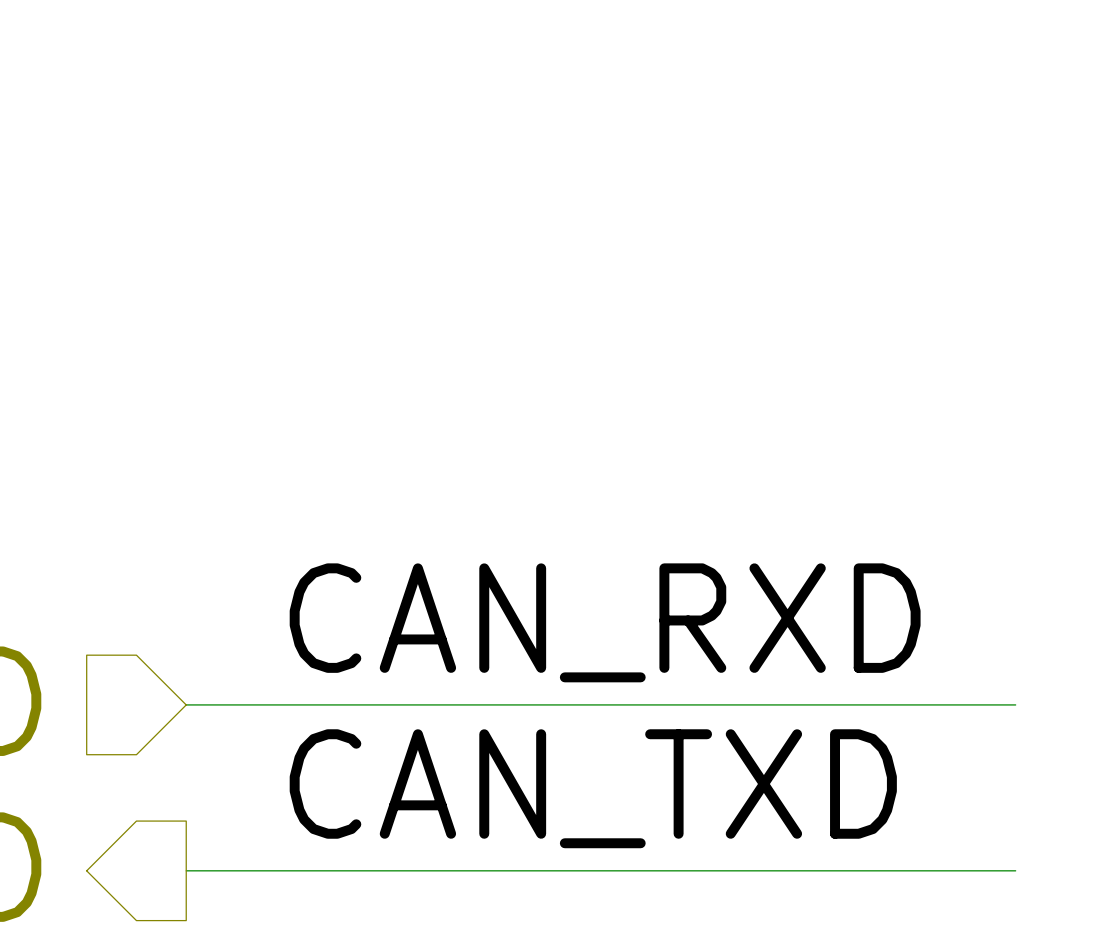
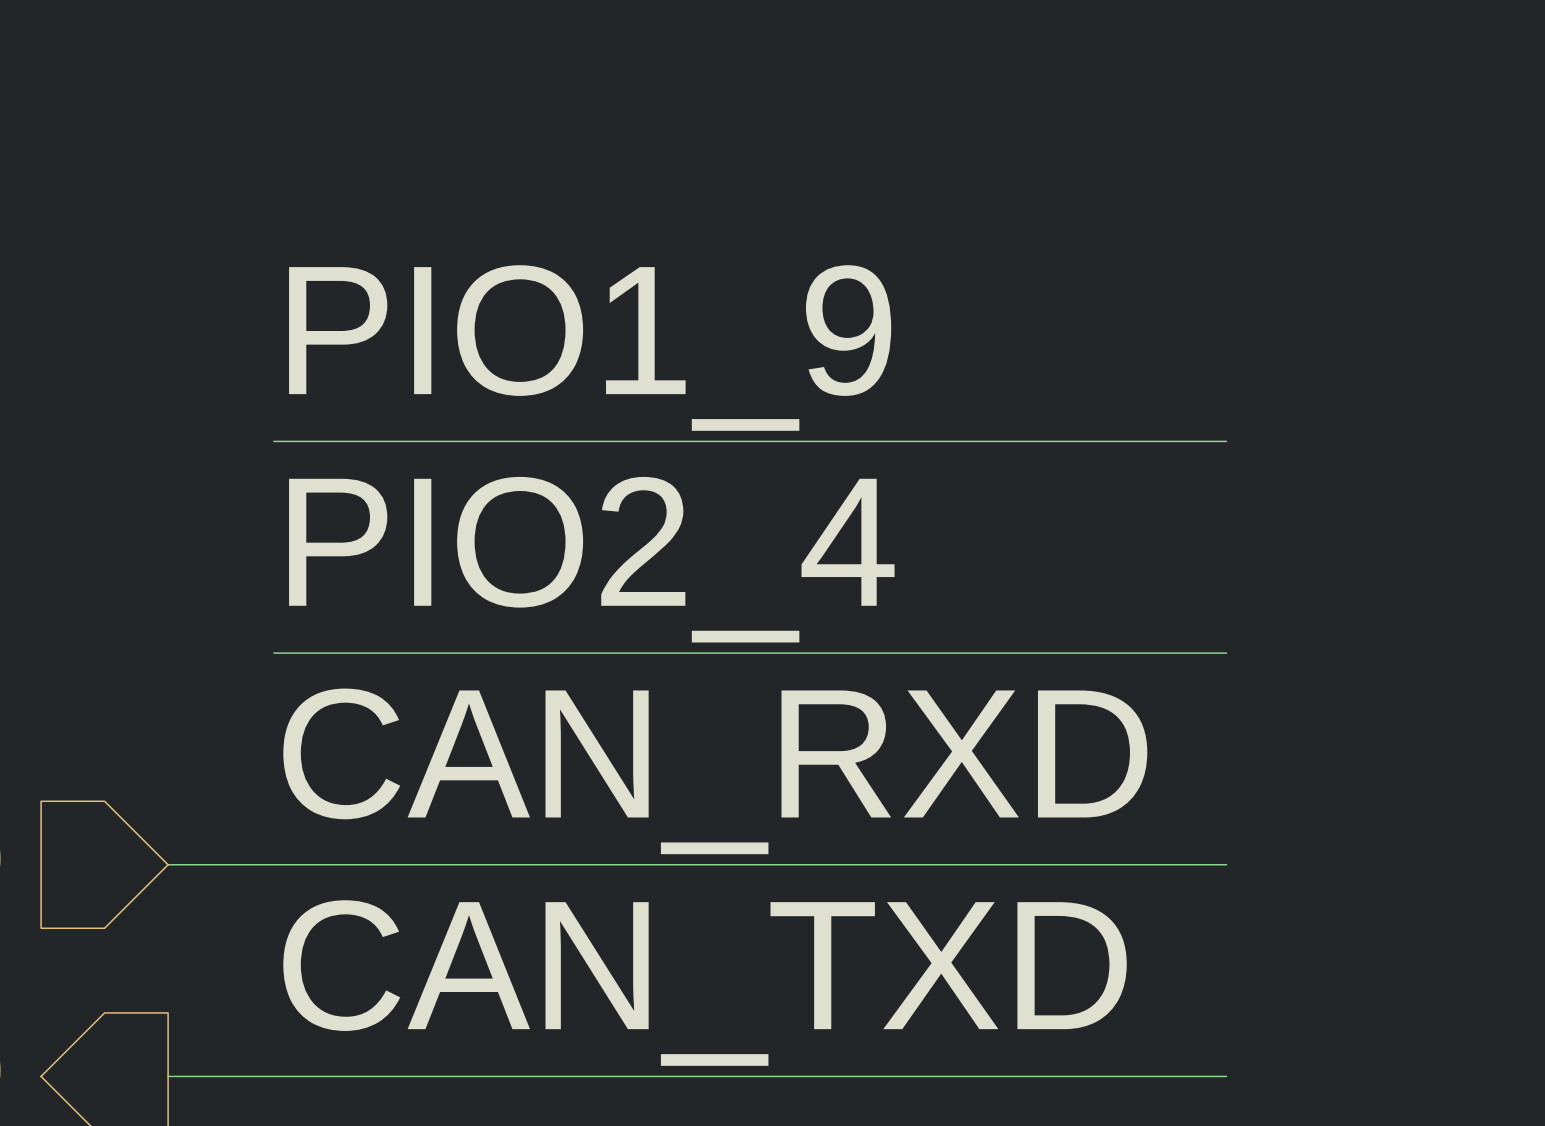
label: none -> PIO1_9 (590, 348)
wire: none -> (273, 441) (1226, 441)
label: none -> PIO2_4 (591, 559)
wire: none -> (273, 653) (1226, 653)

